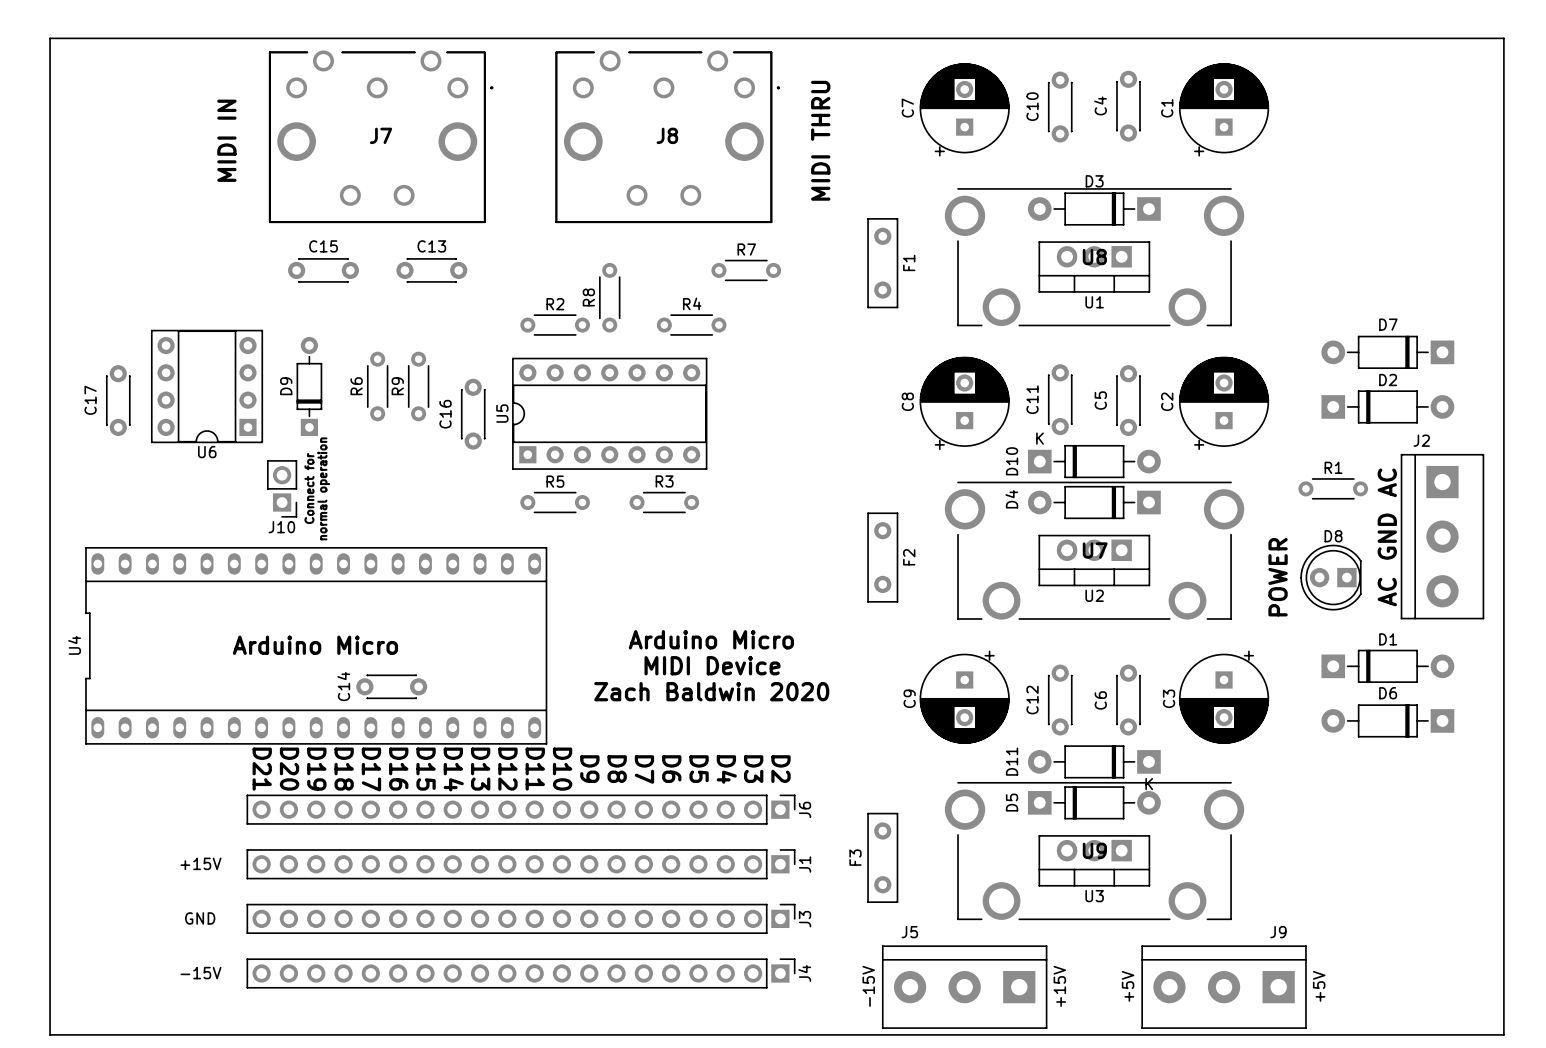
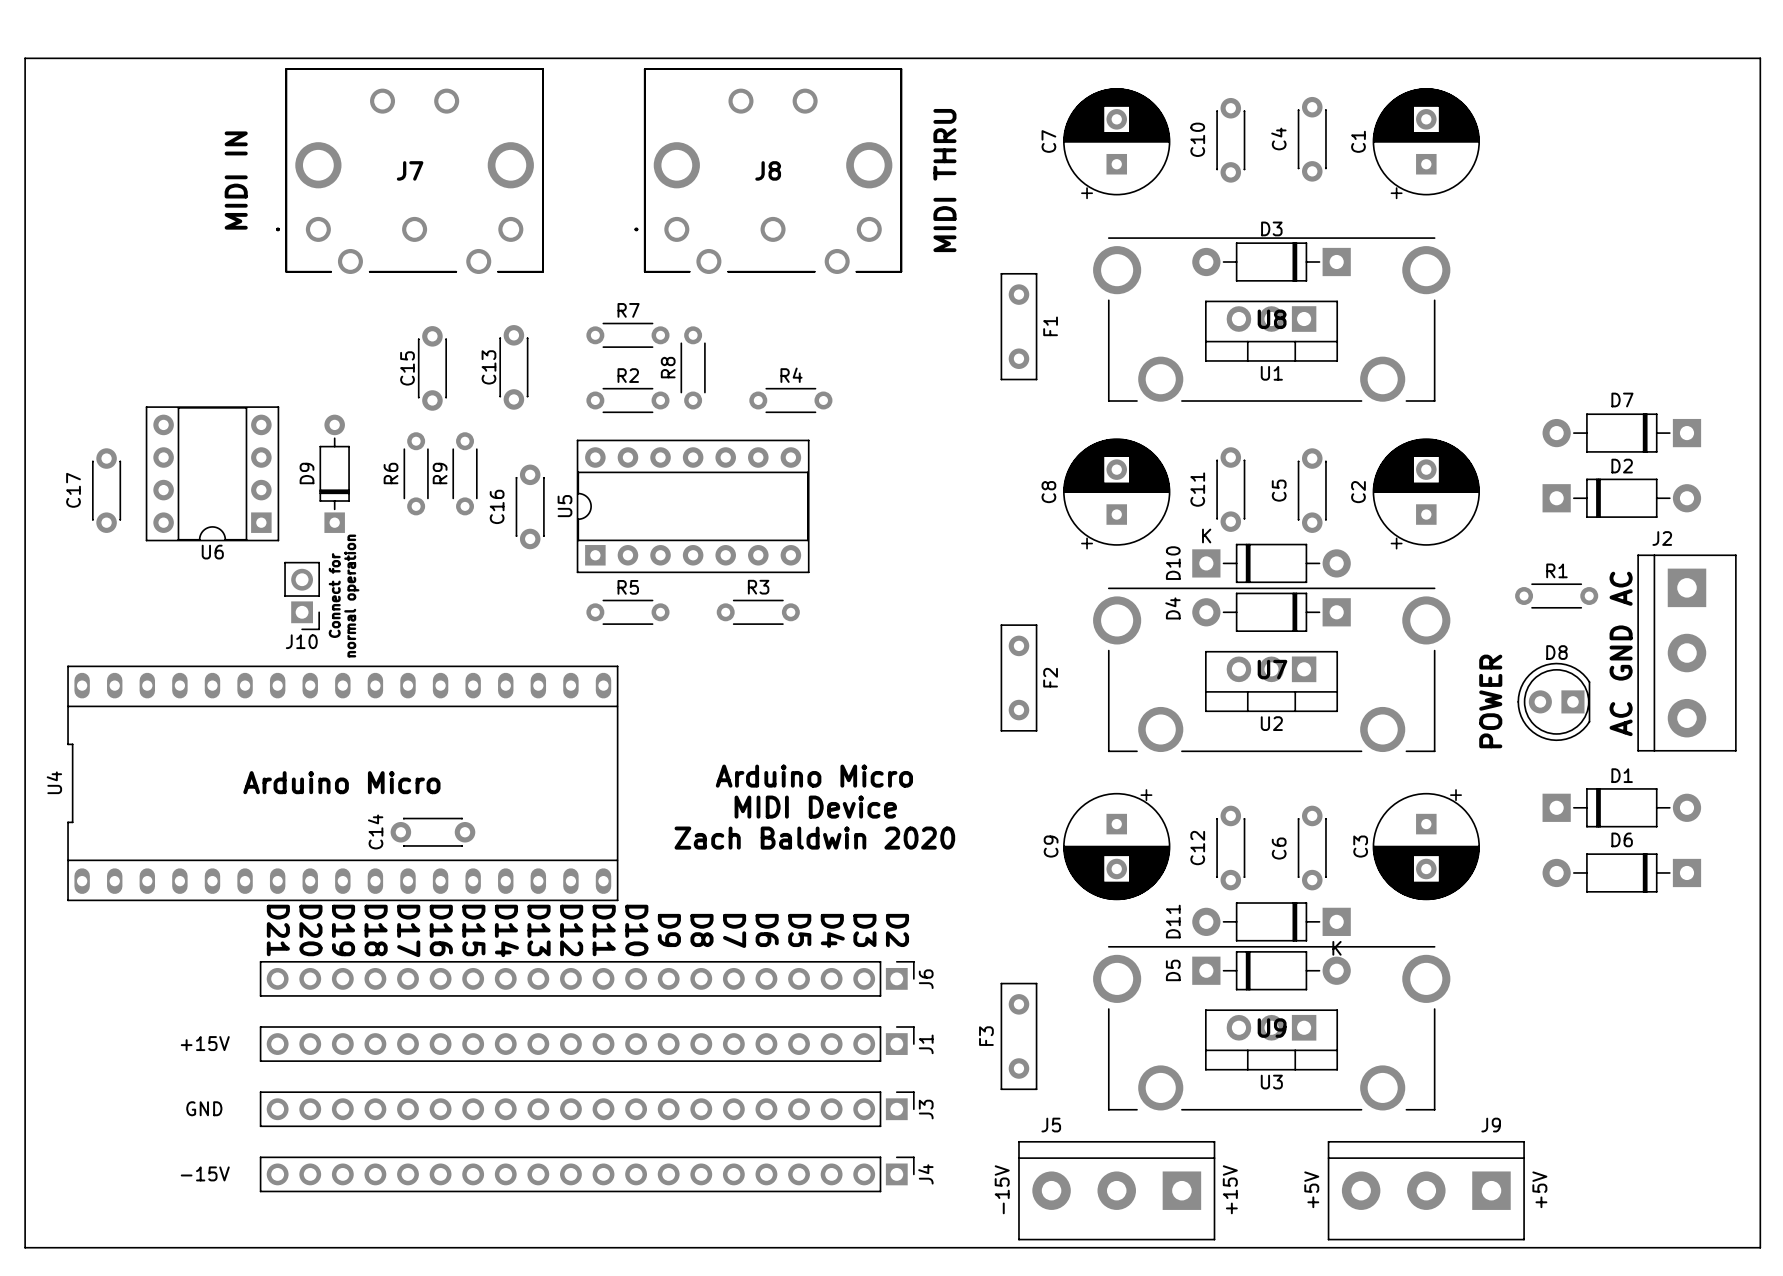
J7 rotation: 0° (381, 136) -> 180° (409, 171)
J8 rotation: 0° (667, 136) -> 180° (768, 171)
C15 name position: C15 (323, 246) -> C15 (407, 368)
C13 name position: C13 (431, 246) -> C13 (488, 367)
C15 rotation: 0° (323, 270) -> 90° clockwise (432, 368)
C15 position: (323, 270) -> (432, 368)
C13 rotation: 0° (431, 270) -> 90° clockwise (513, 367)
R7 position: (746, 270) -> (627, 335)

